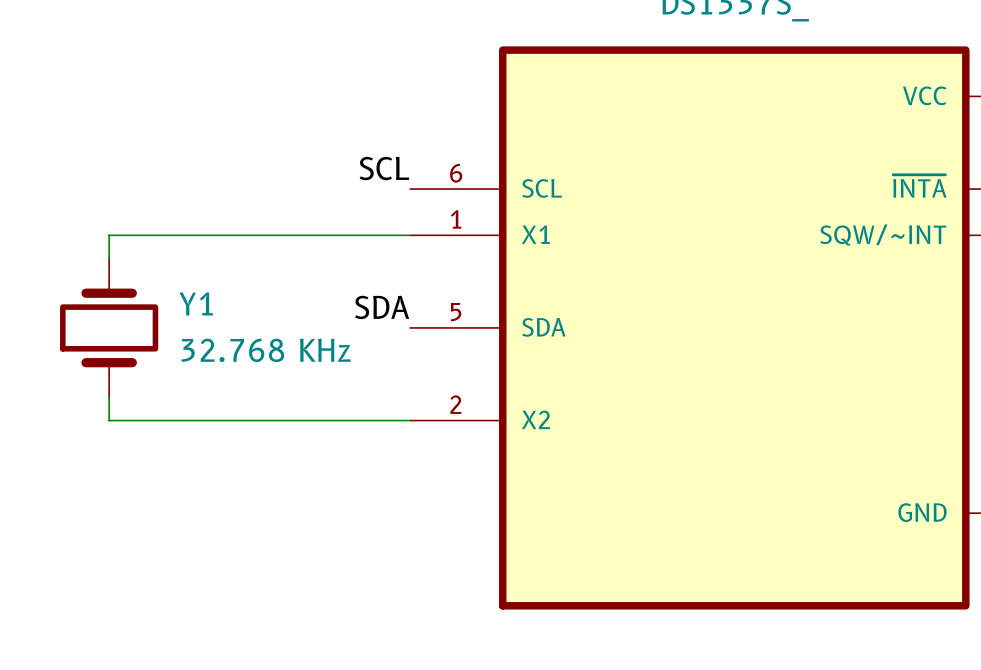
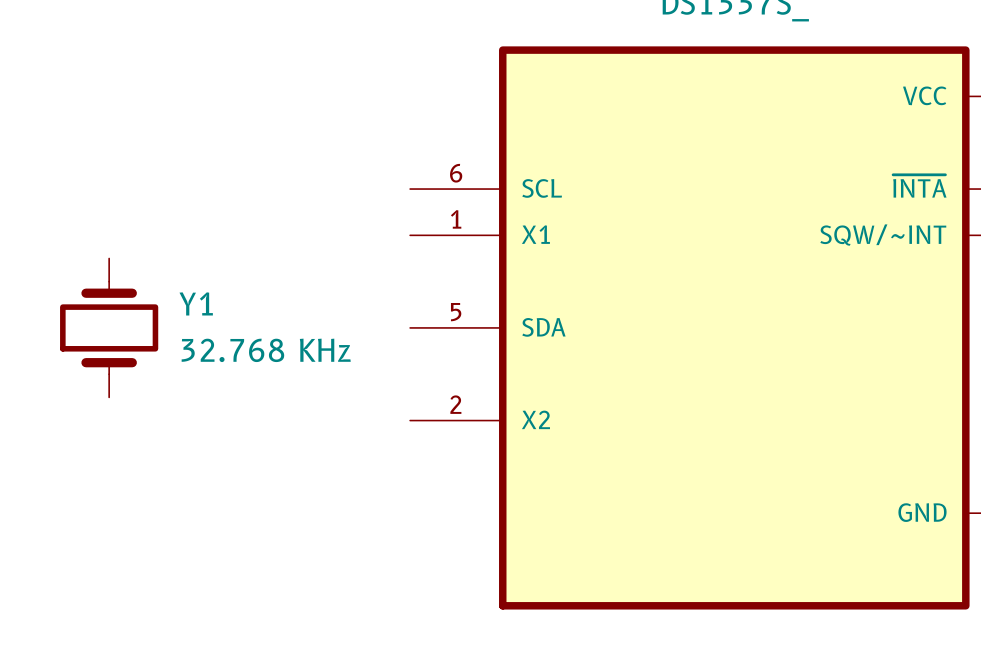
label: SCL (384, 168) -> none
wire: (410, 235) (109, 235) (109, 258) -> none
label: SDA (382, 307) -> none
wire: (109, 397) (109, 420) (410, 420) -> none

